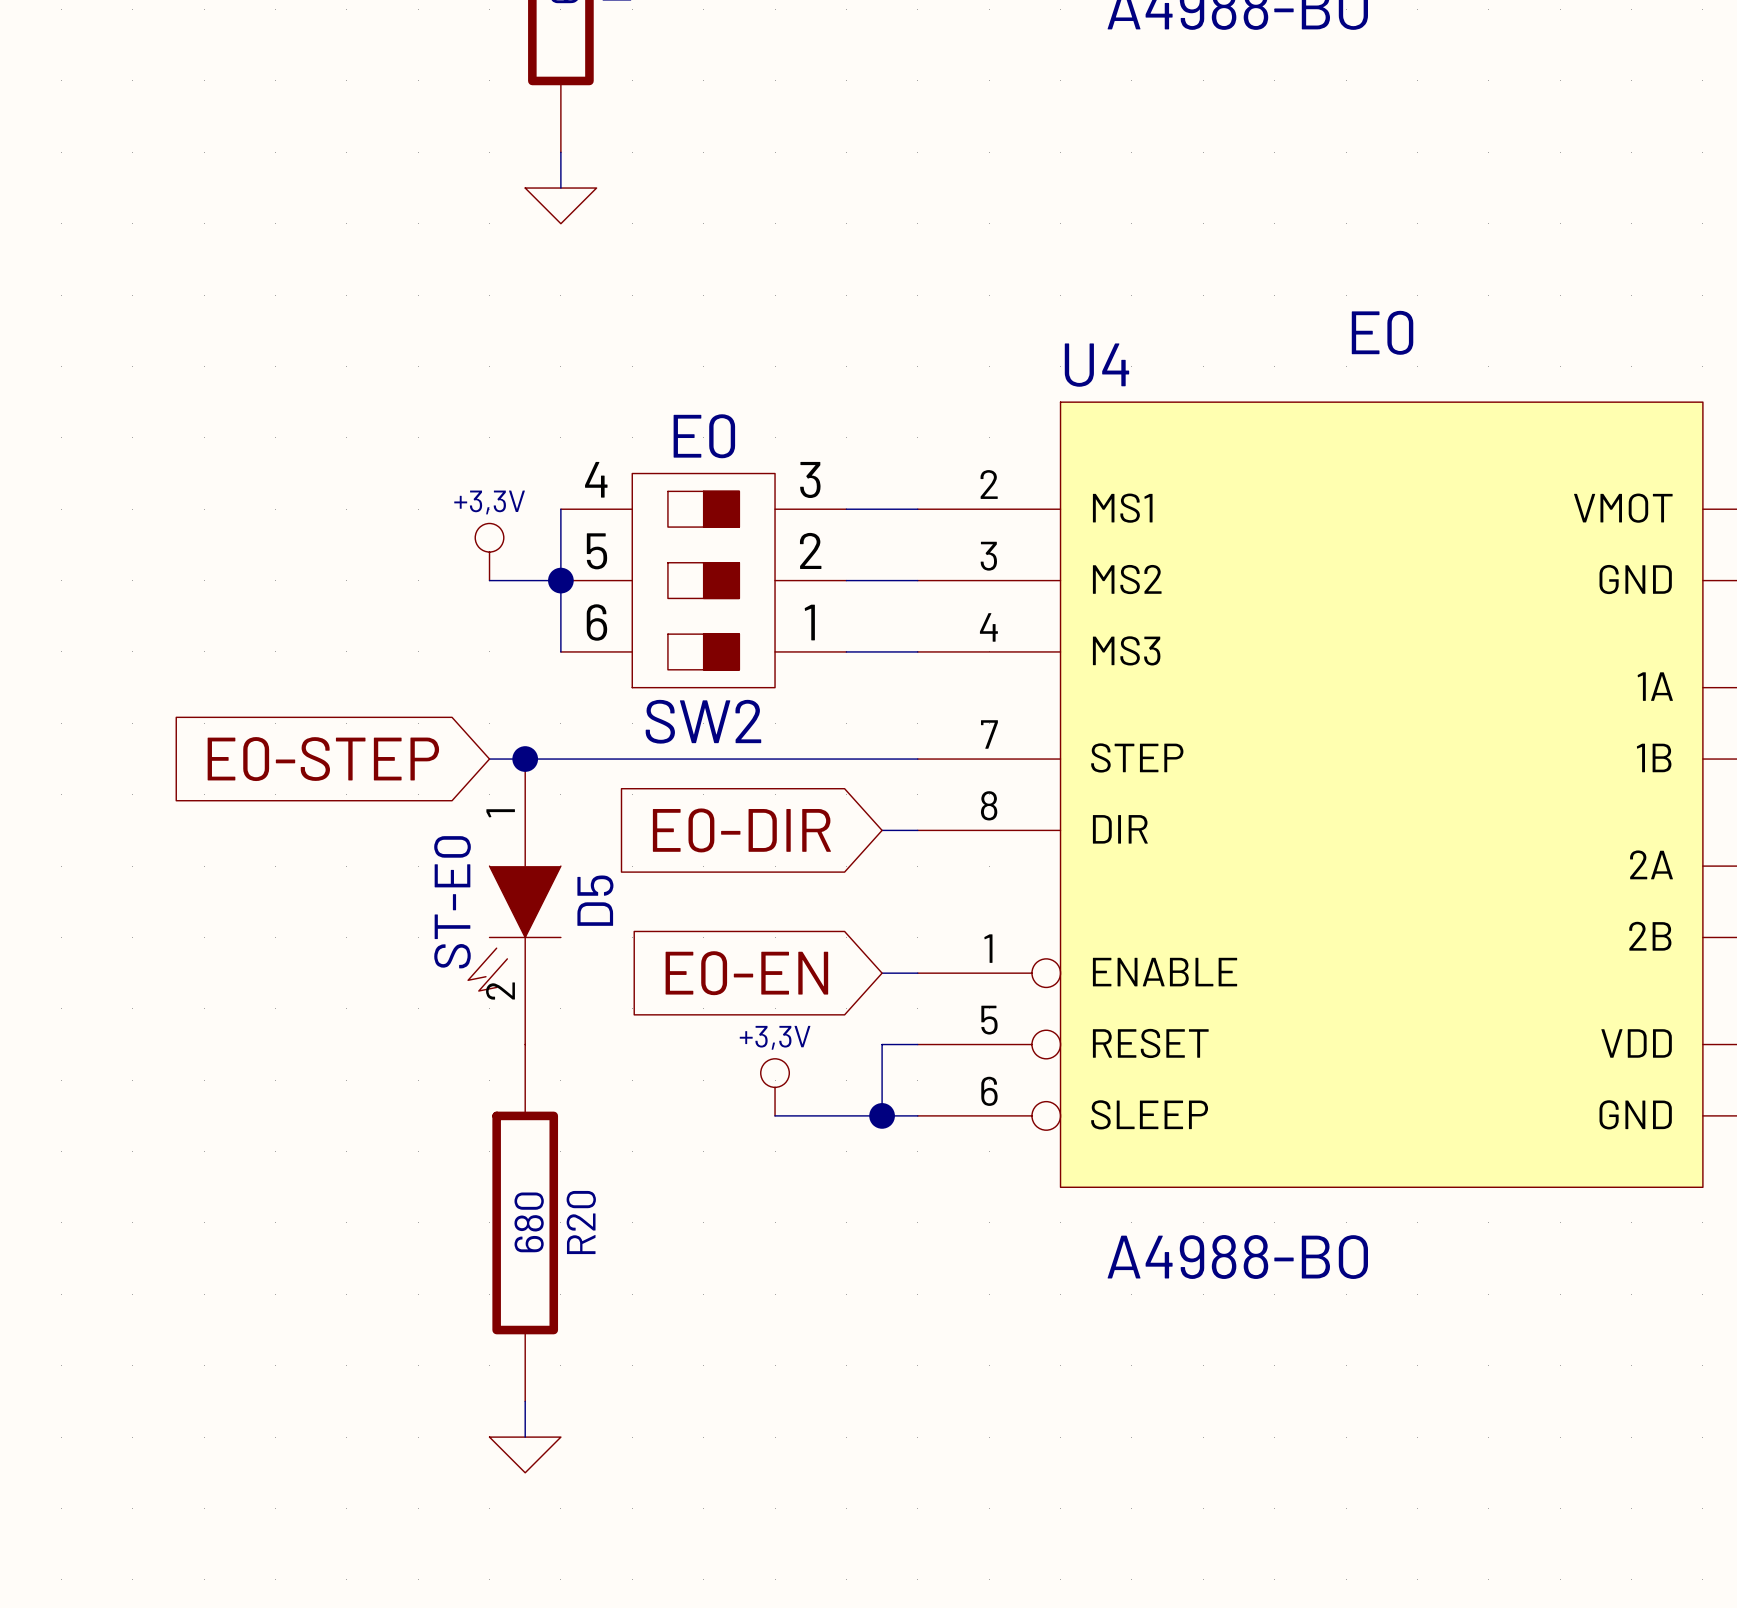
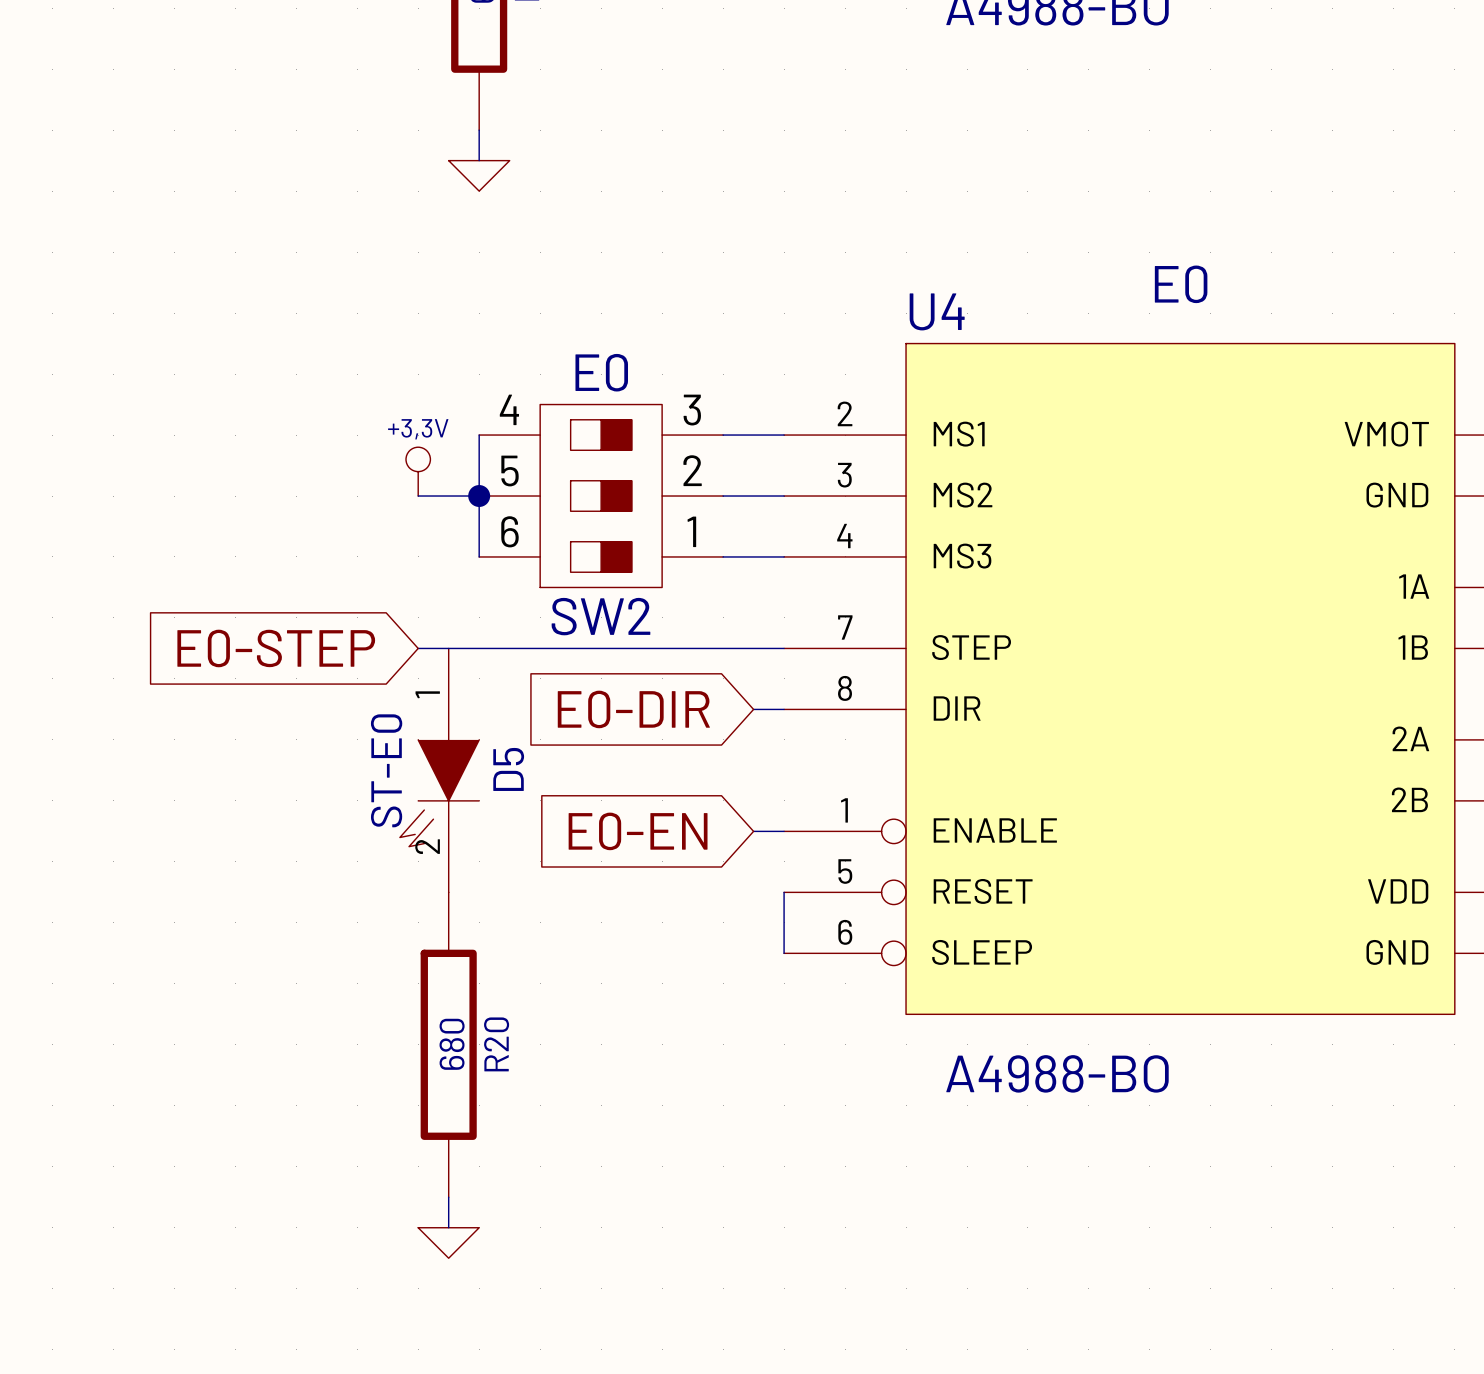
junction: (525, 759) -> none
wire: (917, 1044) (882, 1044) (882, 1115) -> (784, 892) (784, 953)
power symbol: +3,3V (775, 1087) -> none
wire: (775, 1115) (917, 1115) -> none
junction: (882, 1115) -> none

